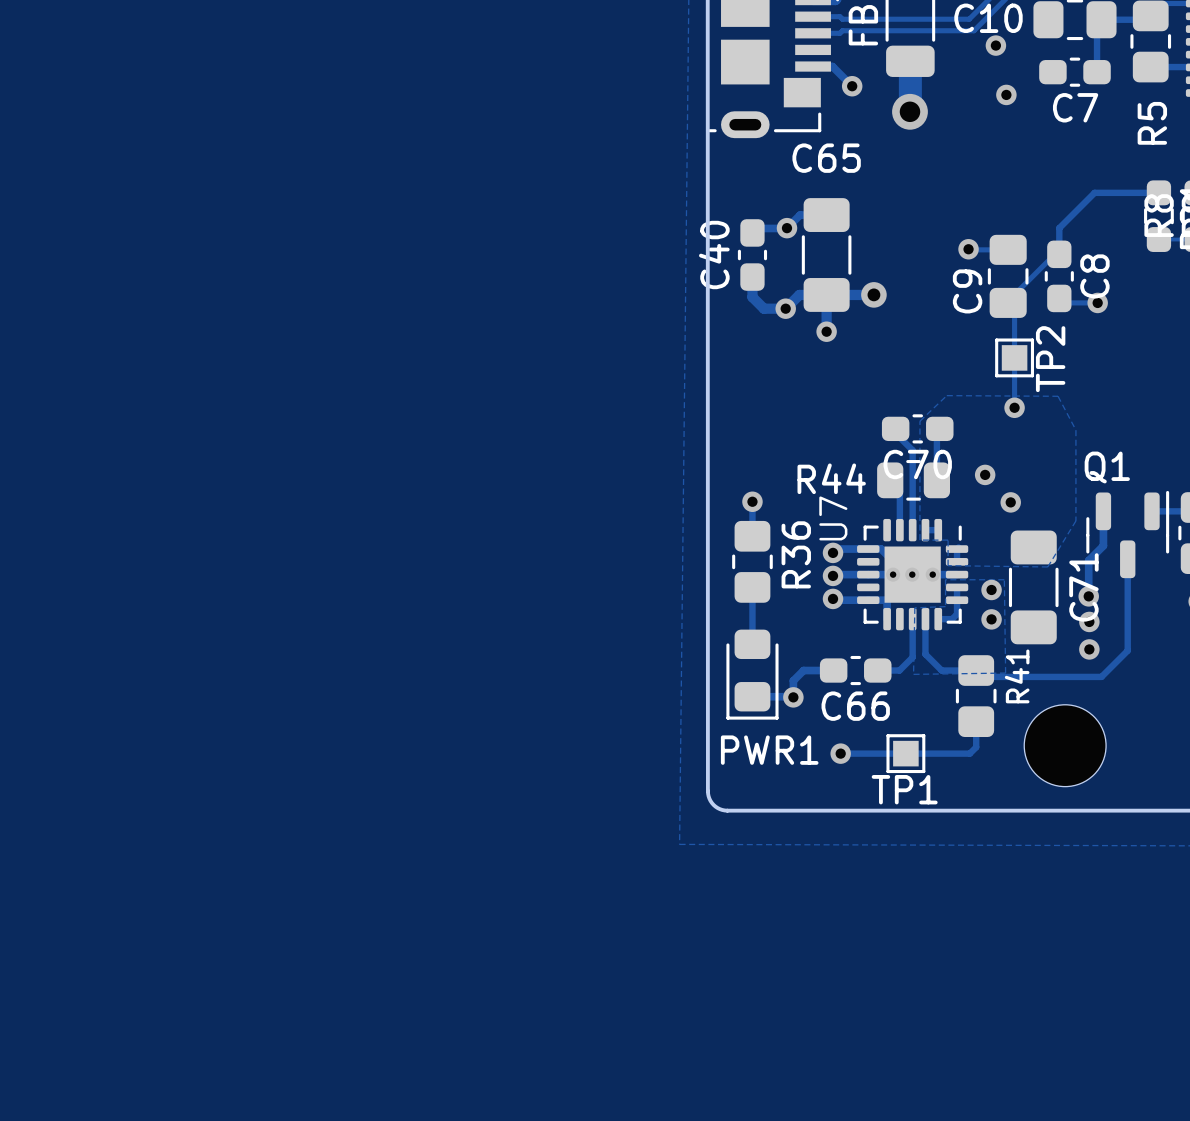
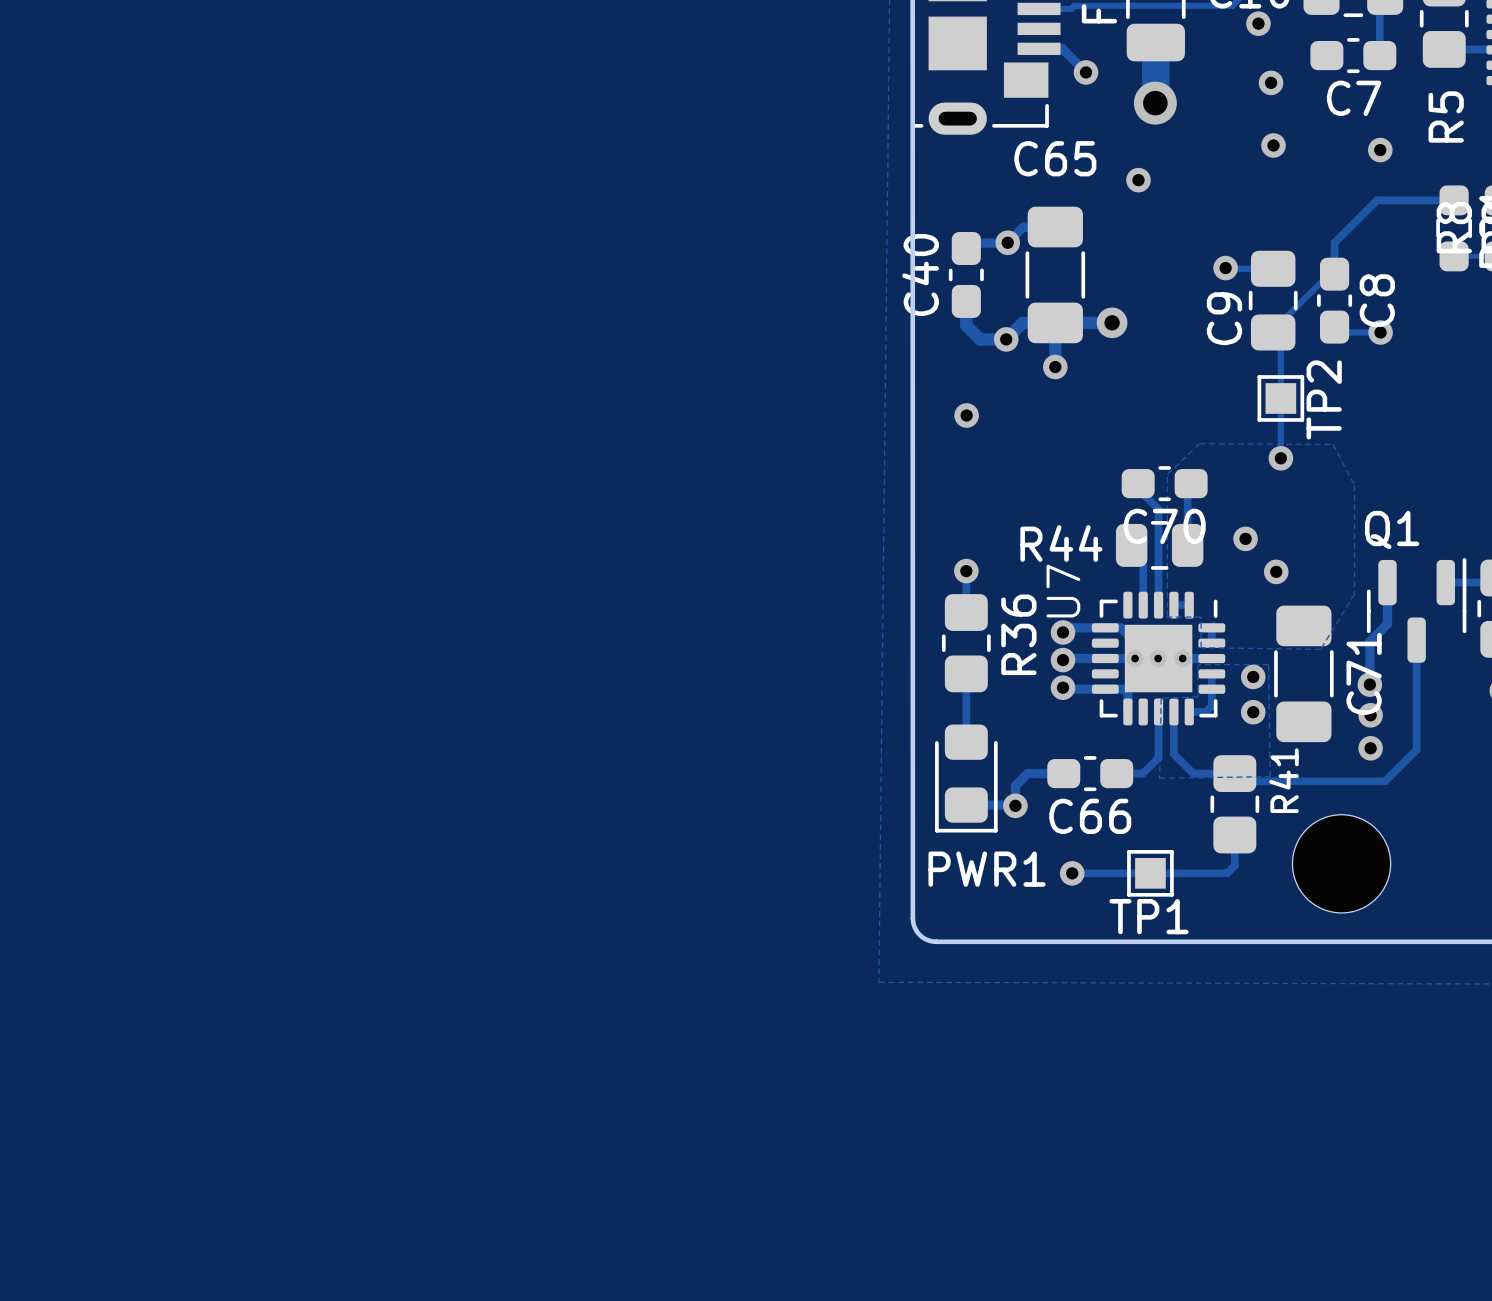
via: none -> (1273, 145)
via: none -> (1380, 150)
via: none -> (1138, 180)
via: none -> (966, 415)

